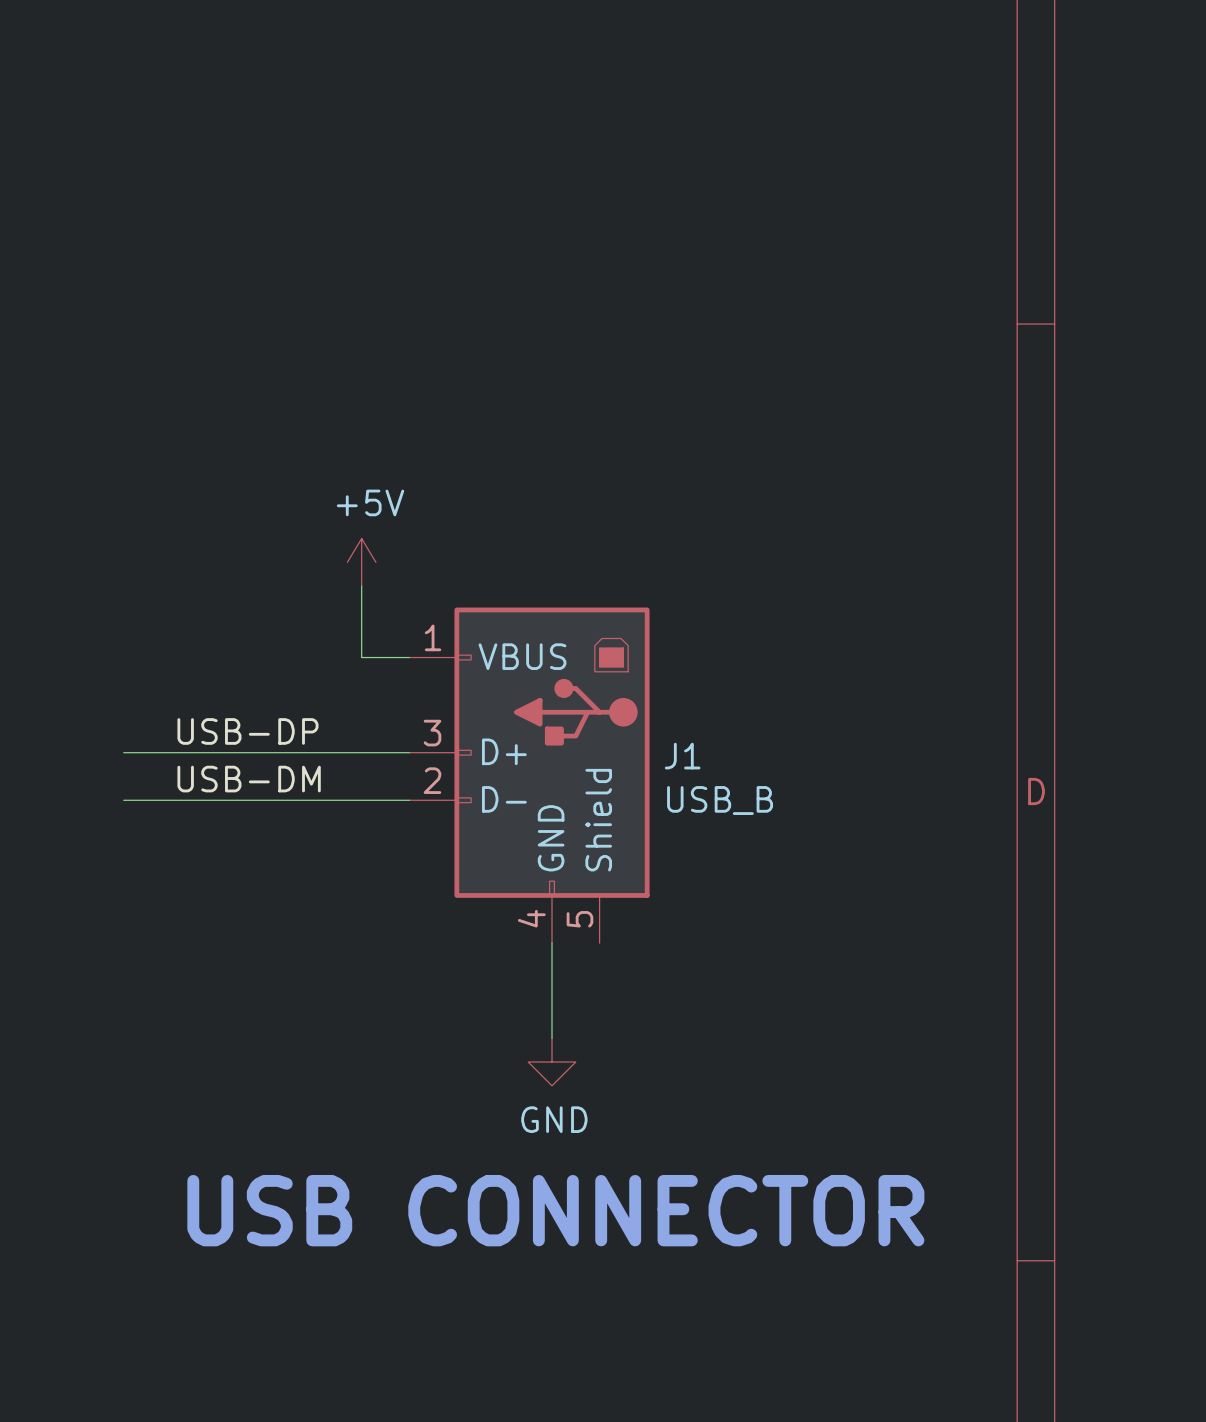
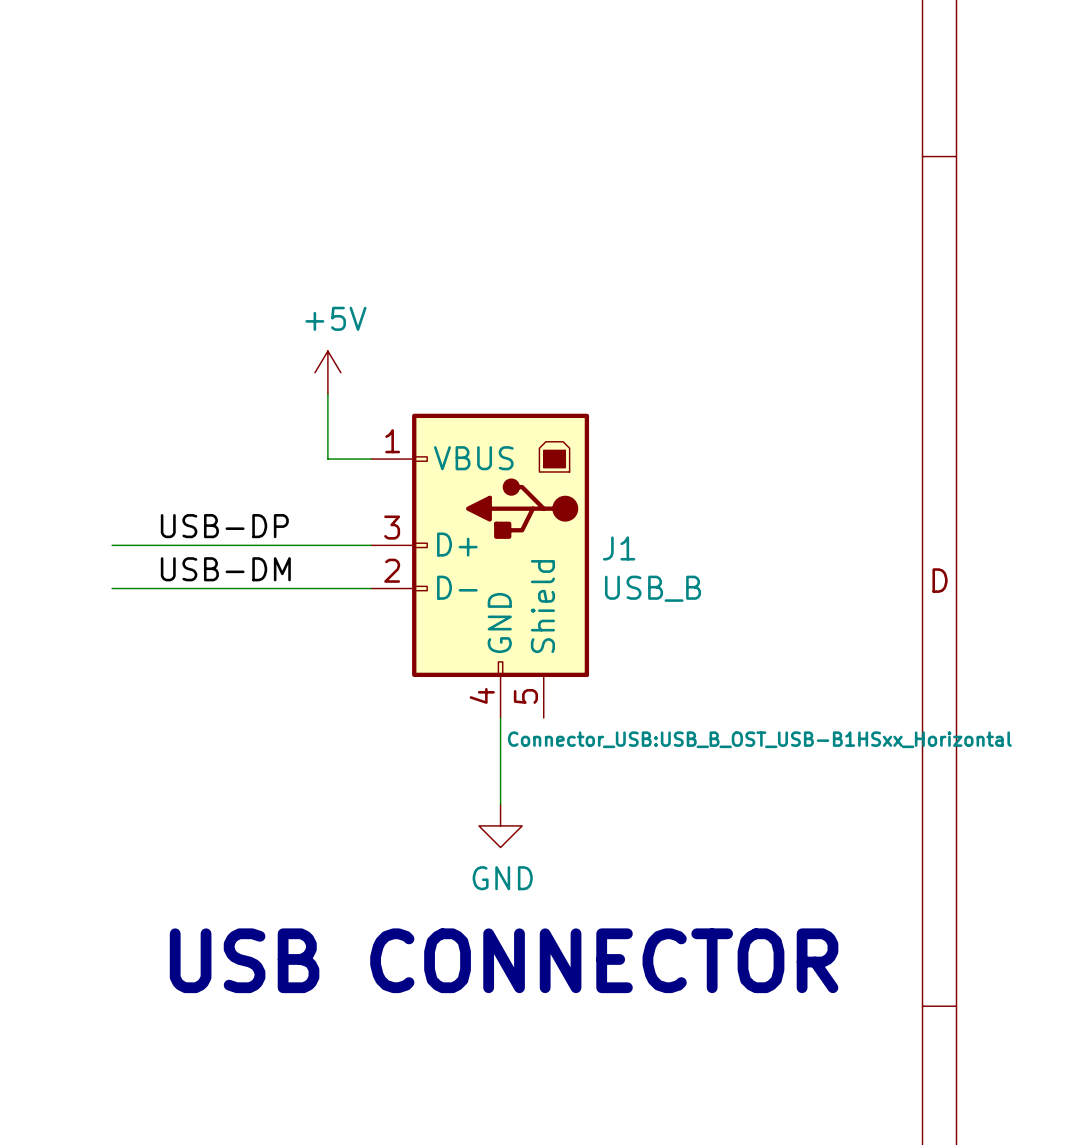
J1 text: none -> Connector_USB:USB_B_OST_USB-B1HSxx_Horizontal (759, 739)

